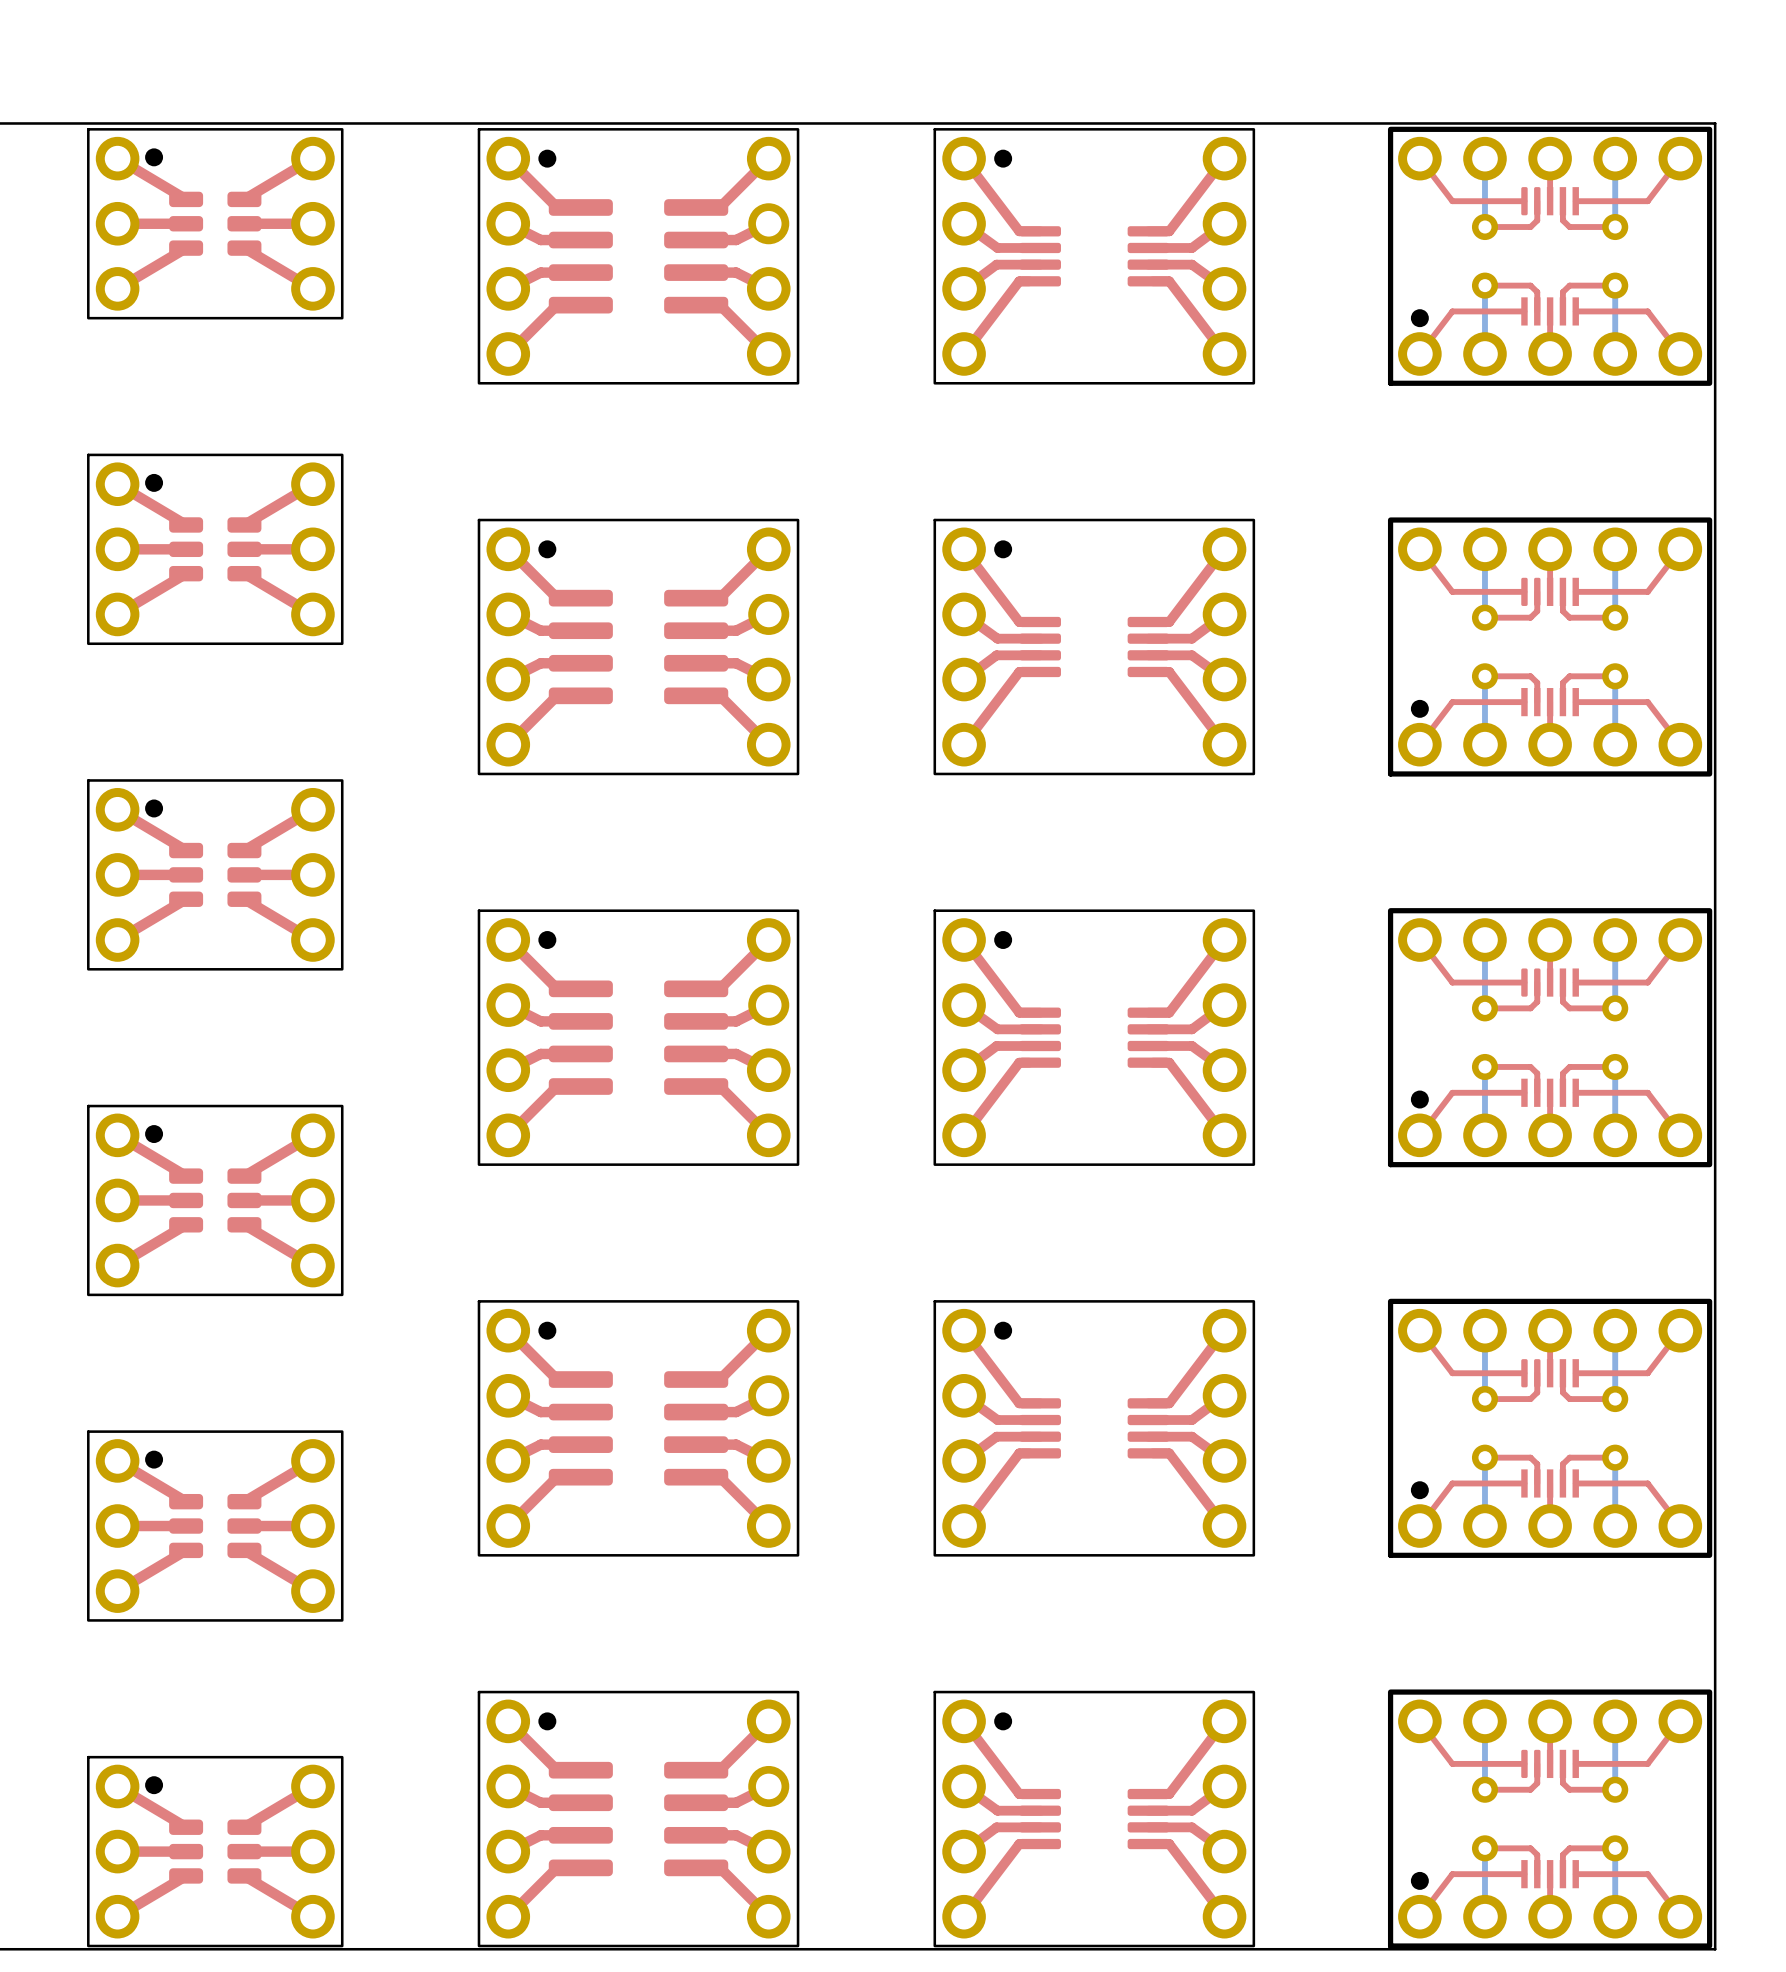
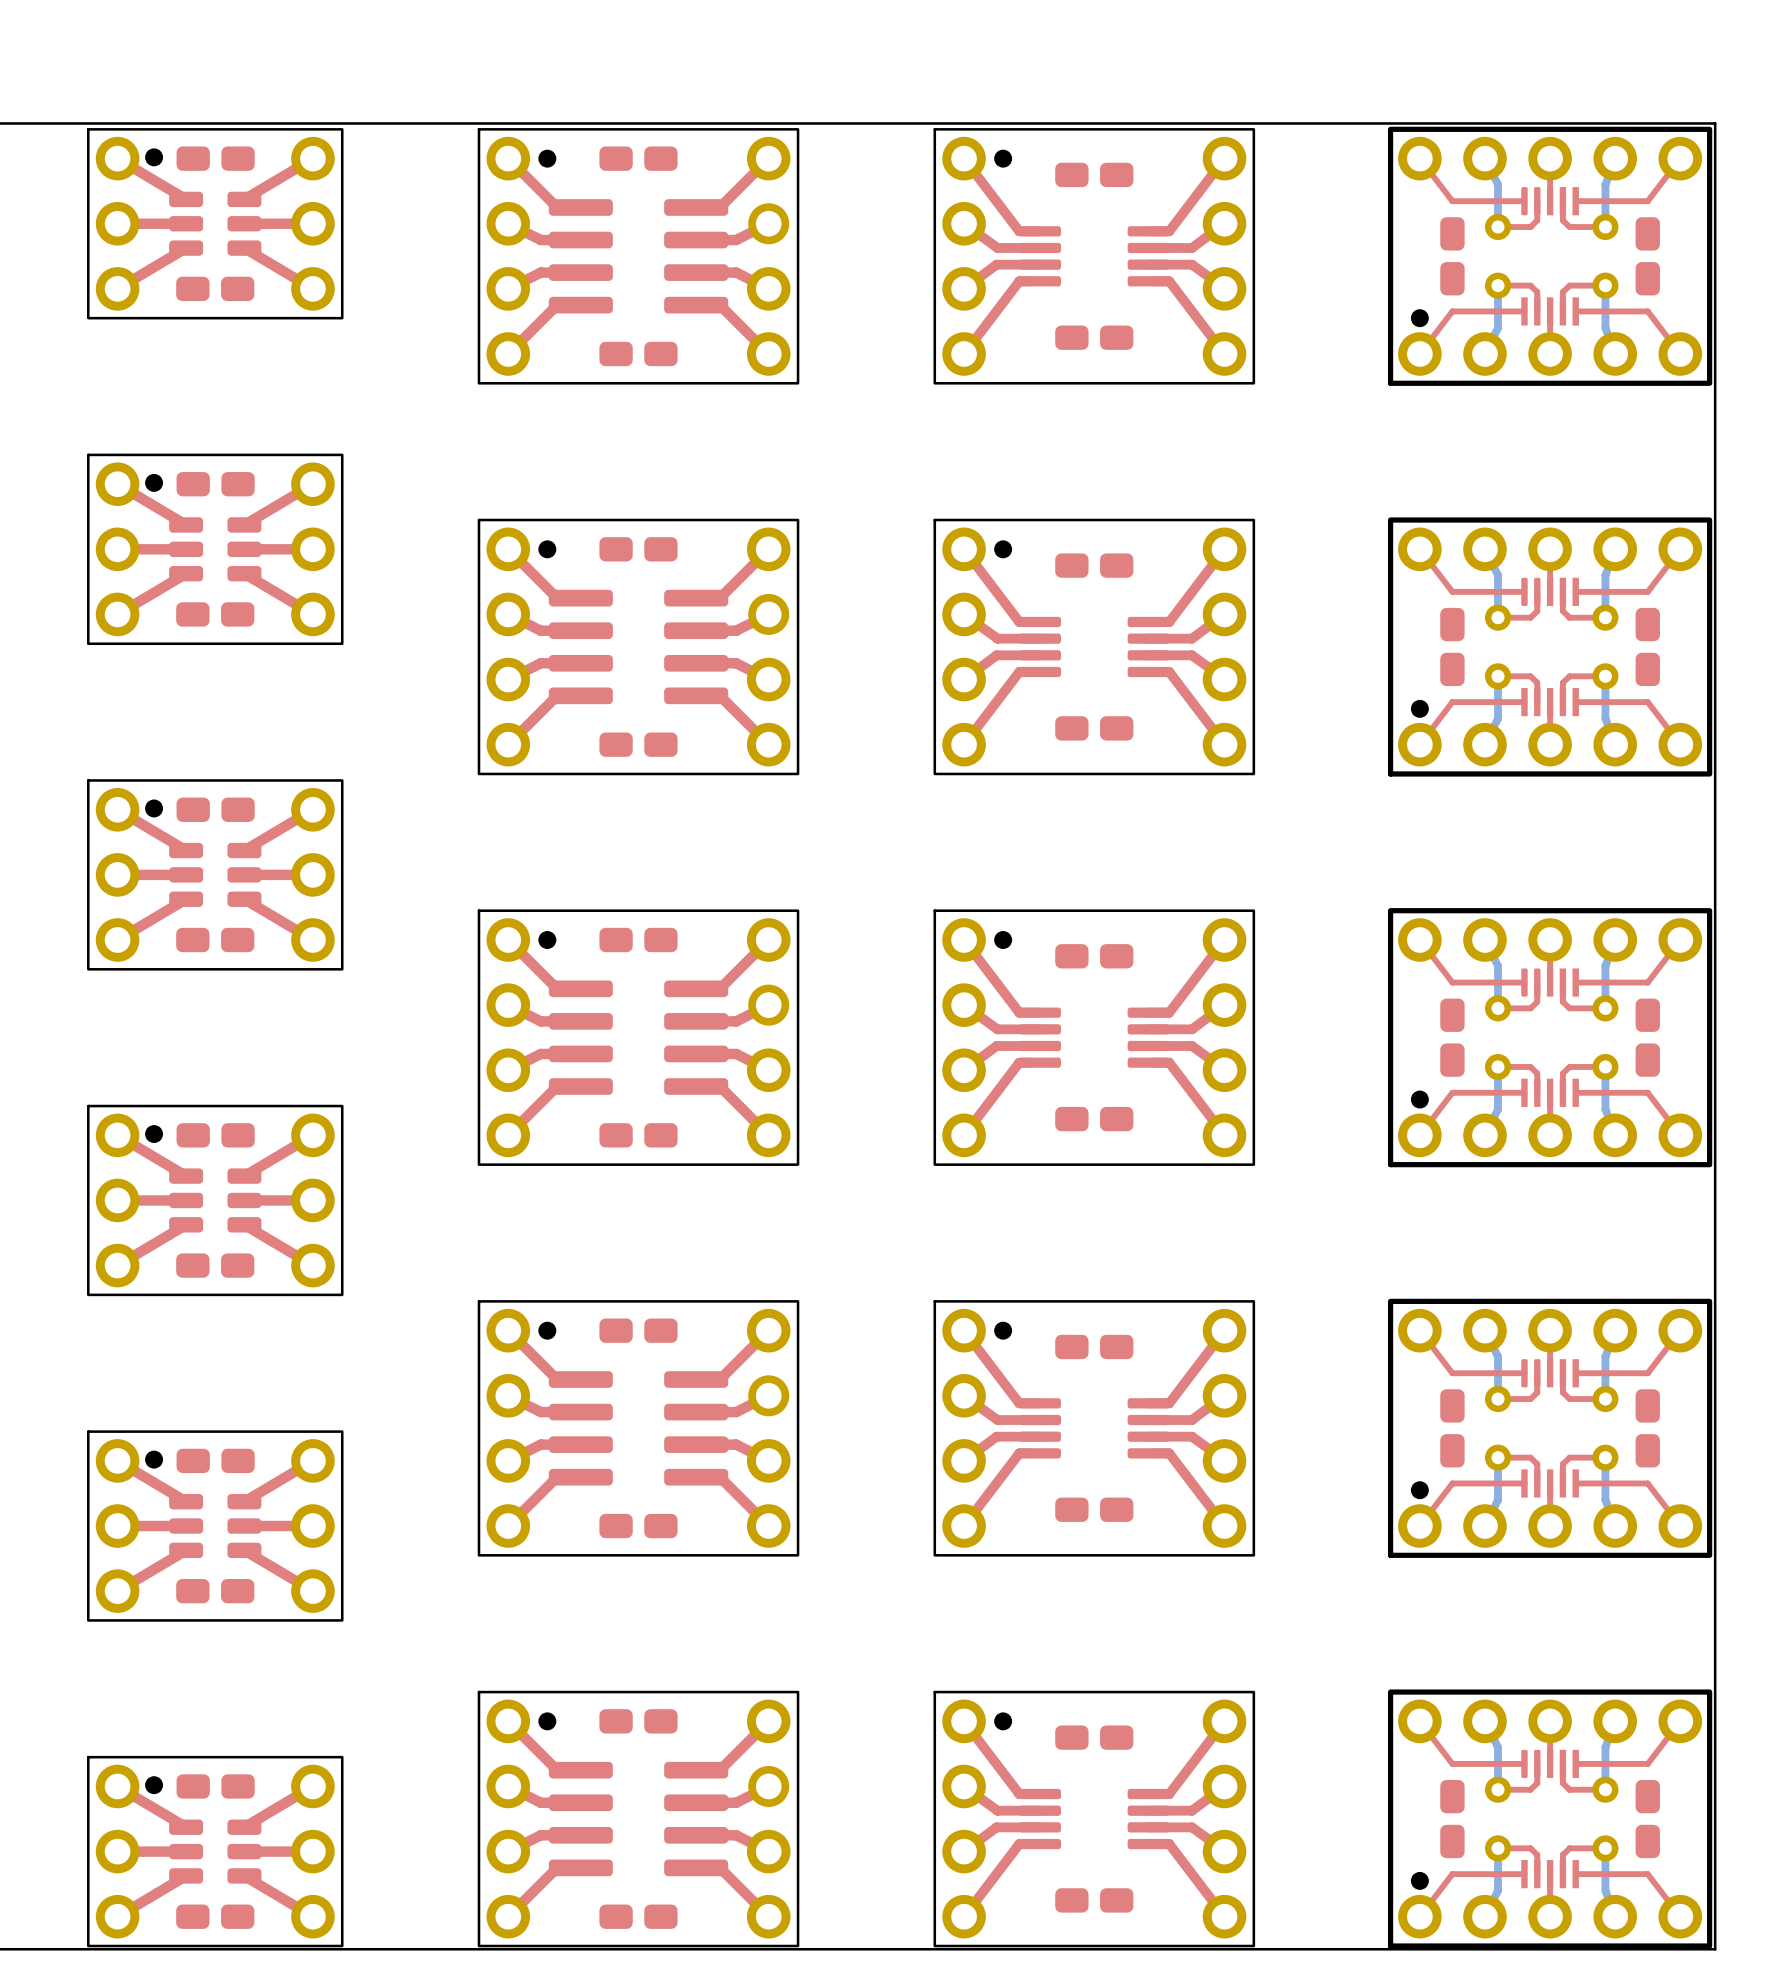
part footprint: [1387, 126, 1713, 386] -> [1387, 126, 1713, 386]
part footprint: [87, 128, 344, 320] -> [87, 128, 344, 320]
part footprint: [477, 128, 800, 385] -> [477, 128, 800, 385]
part footprint: [933, 128, 1256, 385] -> [933, 128, 1256, 385]
part footprint: [87, 453, 344, 646] -> [87, 453, 344, 646]
part footprint: [1387, 517, 1713, 777] -> [1387, 517, 1713, 777]
part footprint: [477, 518, 800, 776] -> [477, 518, 800, 776]
part footprint: [933, 518, 1256, 776] -> [933, 518, 1256, 776]
part footprint: [87, 779, 344, 971] -> [87, 779, 344, 971]
part footprint: [1387, 908, 1713, 1168] -> [1387, 908, 1713, 1168]
part footprint: [477, 909, 800, 1166] -> [477, 909, 800, 1166]
part footprint: [933, 909, 1256, 1166] -> [933, 909, 1256, 1166]
part footprint: [87, 1104, 344, 1297] -> [87, 1104, 344, 1297]
part footprint: [1387, 1298, 1713, 1558] -> [1387, 1298, 1713, 1558]
part footprint: [477, 1300, 800, 1557] -> [477, 1300, 800, 1557]
part footprint: [933, 1300, 1256, 1557] -> [933, 1300, 1256, 1557]
part footprint: [87, 1430, 344, 1622] -> [87, 1430, 344, 1622]
part footprint: [1387, 1689, 1713, 1949] -> [1387, 1689, 1713, 1949]
part footprint: [477, 1690, 800, 1948] -> [477, 1690, 800, 1948]
part footprint: [933, 1690, 1256, 1948] -> [933, 1690, 1256, 1948]
part footprint: [87, 1755, 344, 1948] -> [87, 1755, 344, 1948]

